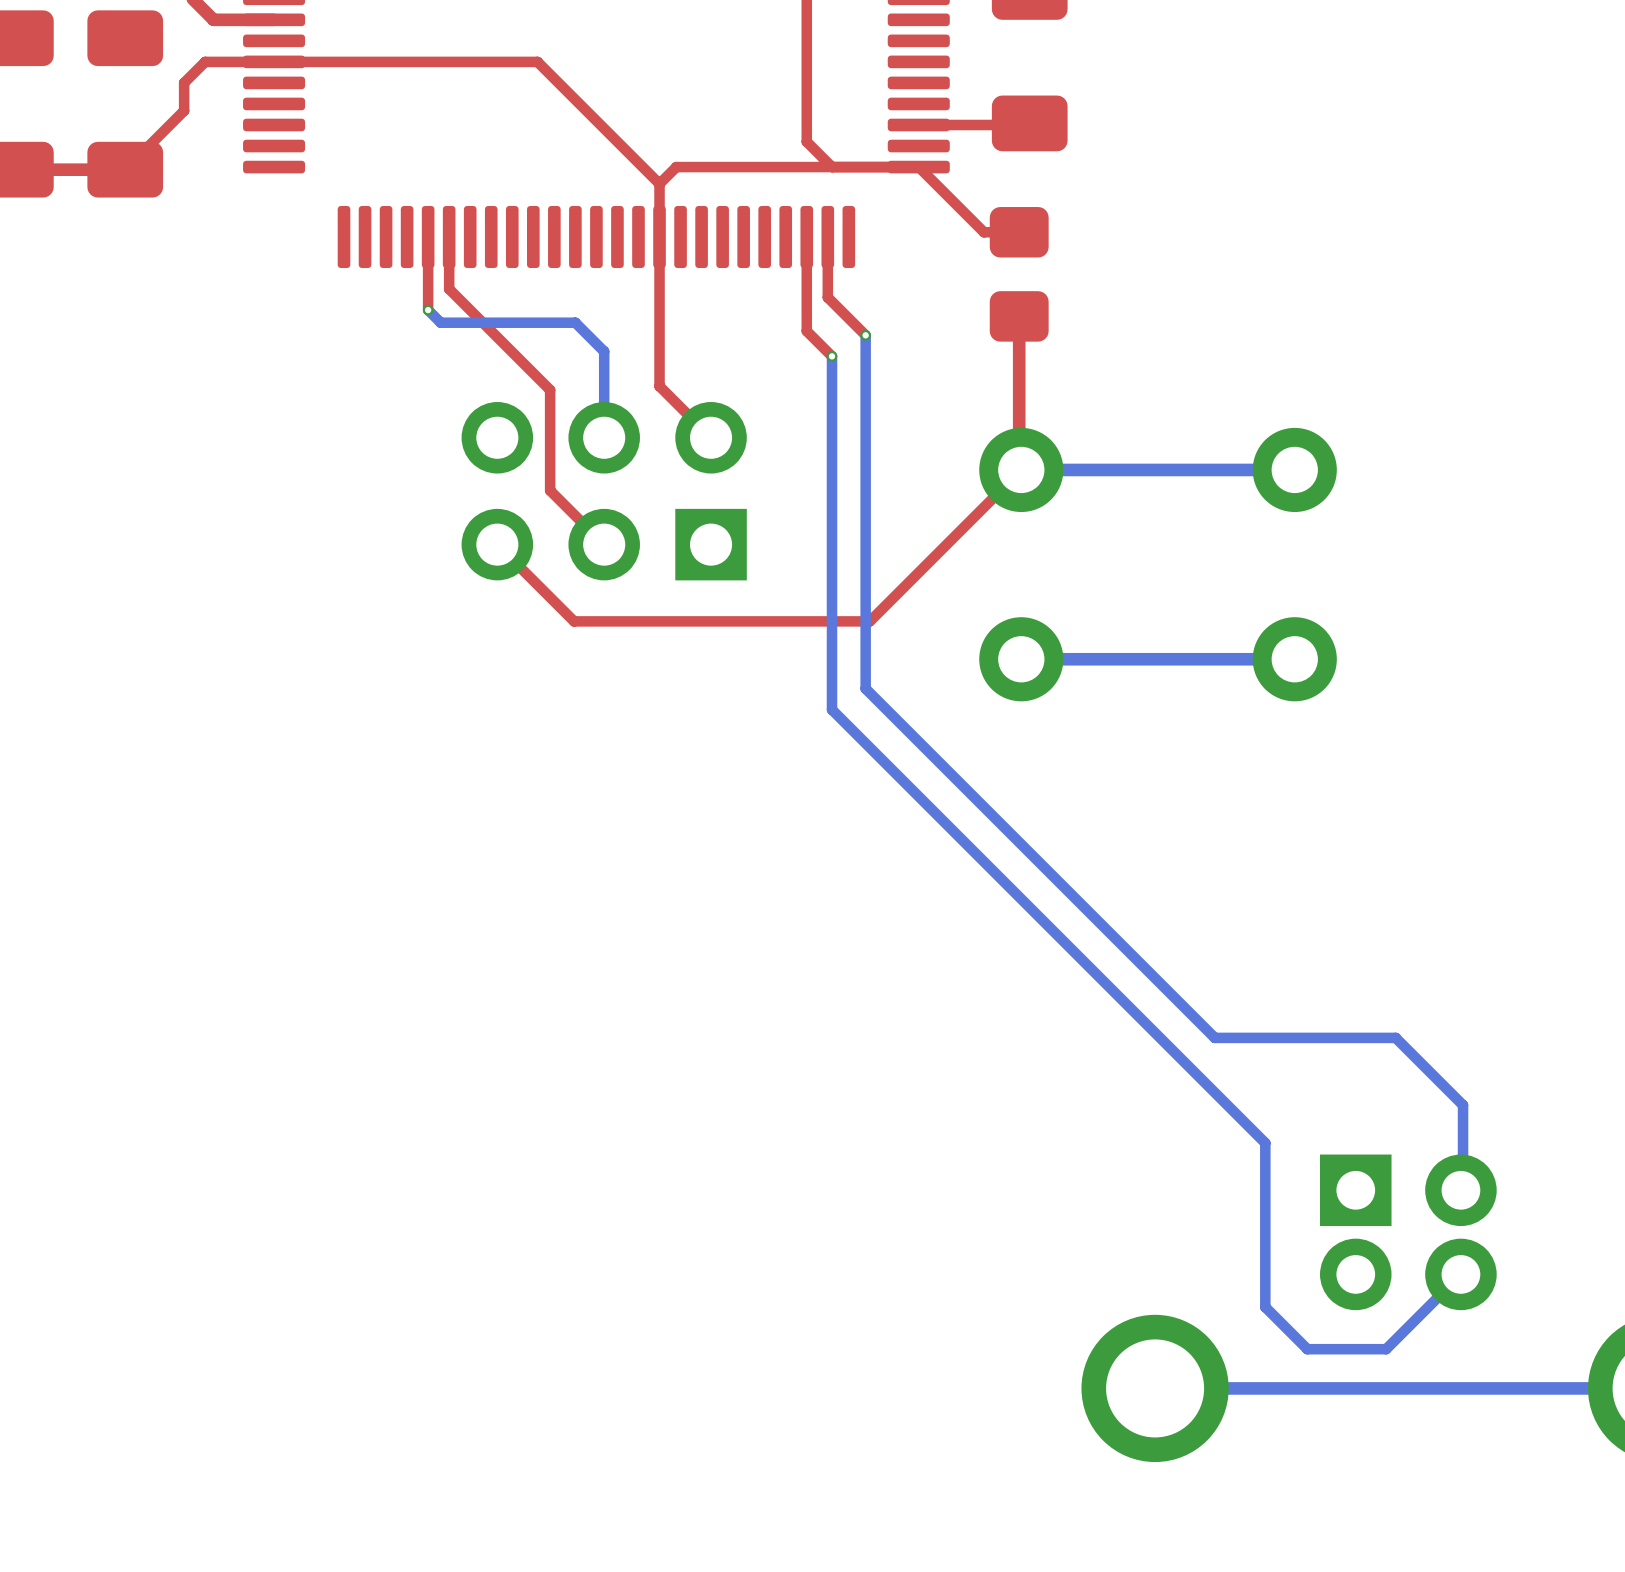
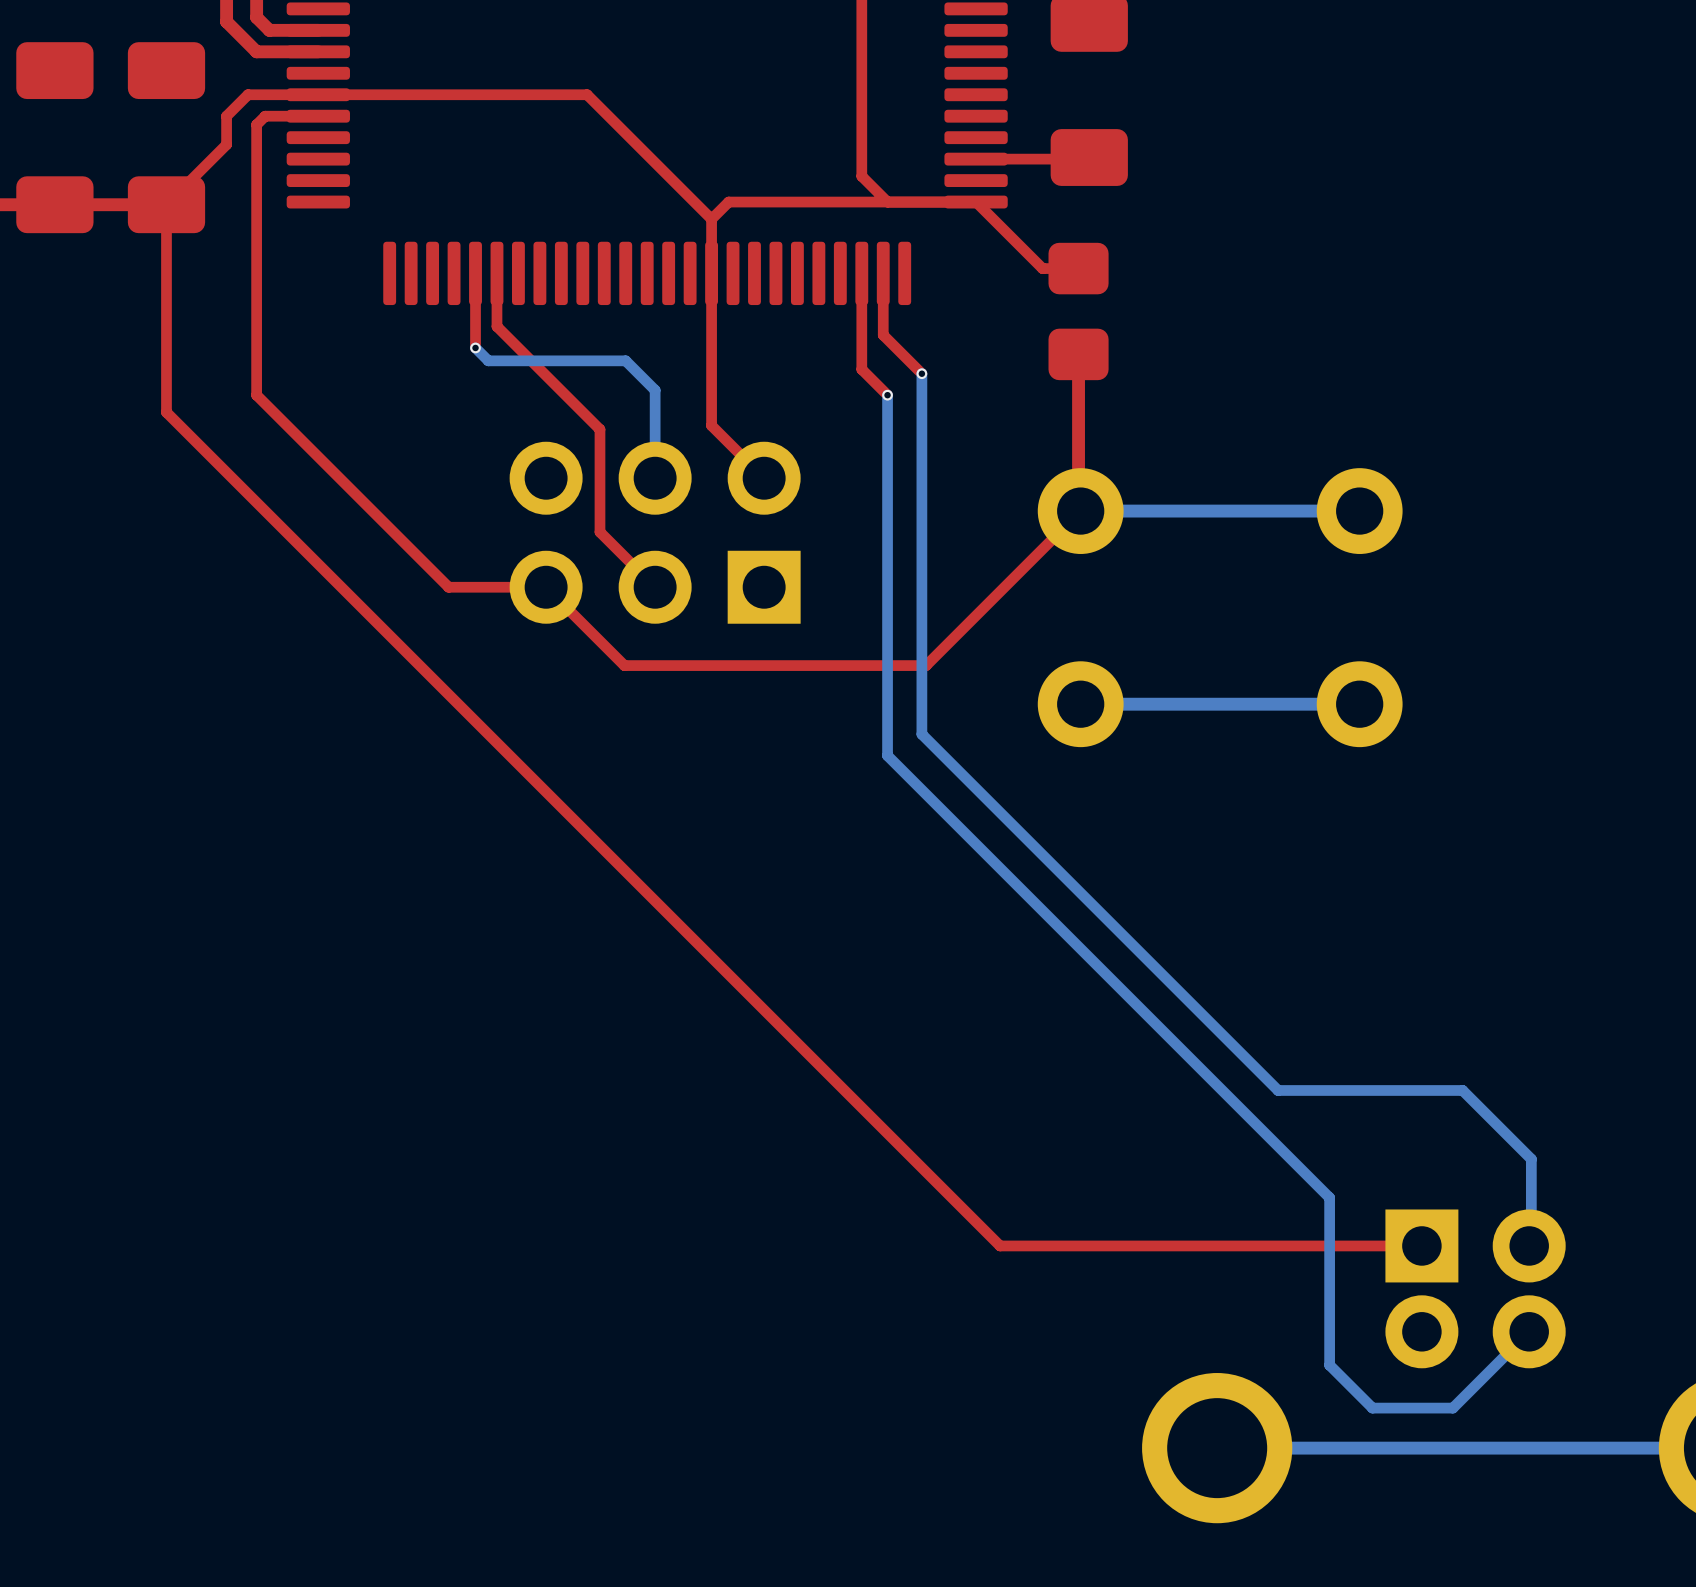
top track: none -> (318, 116) (265, 116) (256, 124) (256, 395) (448, 587) (546, 587)
top track: none -> (166, 204) (166, 412) (1000, 1245) (1421, 1245)

